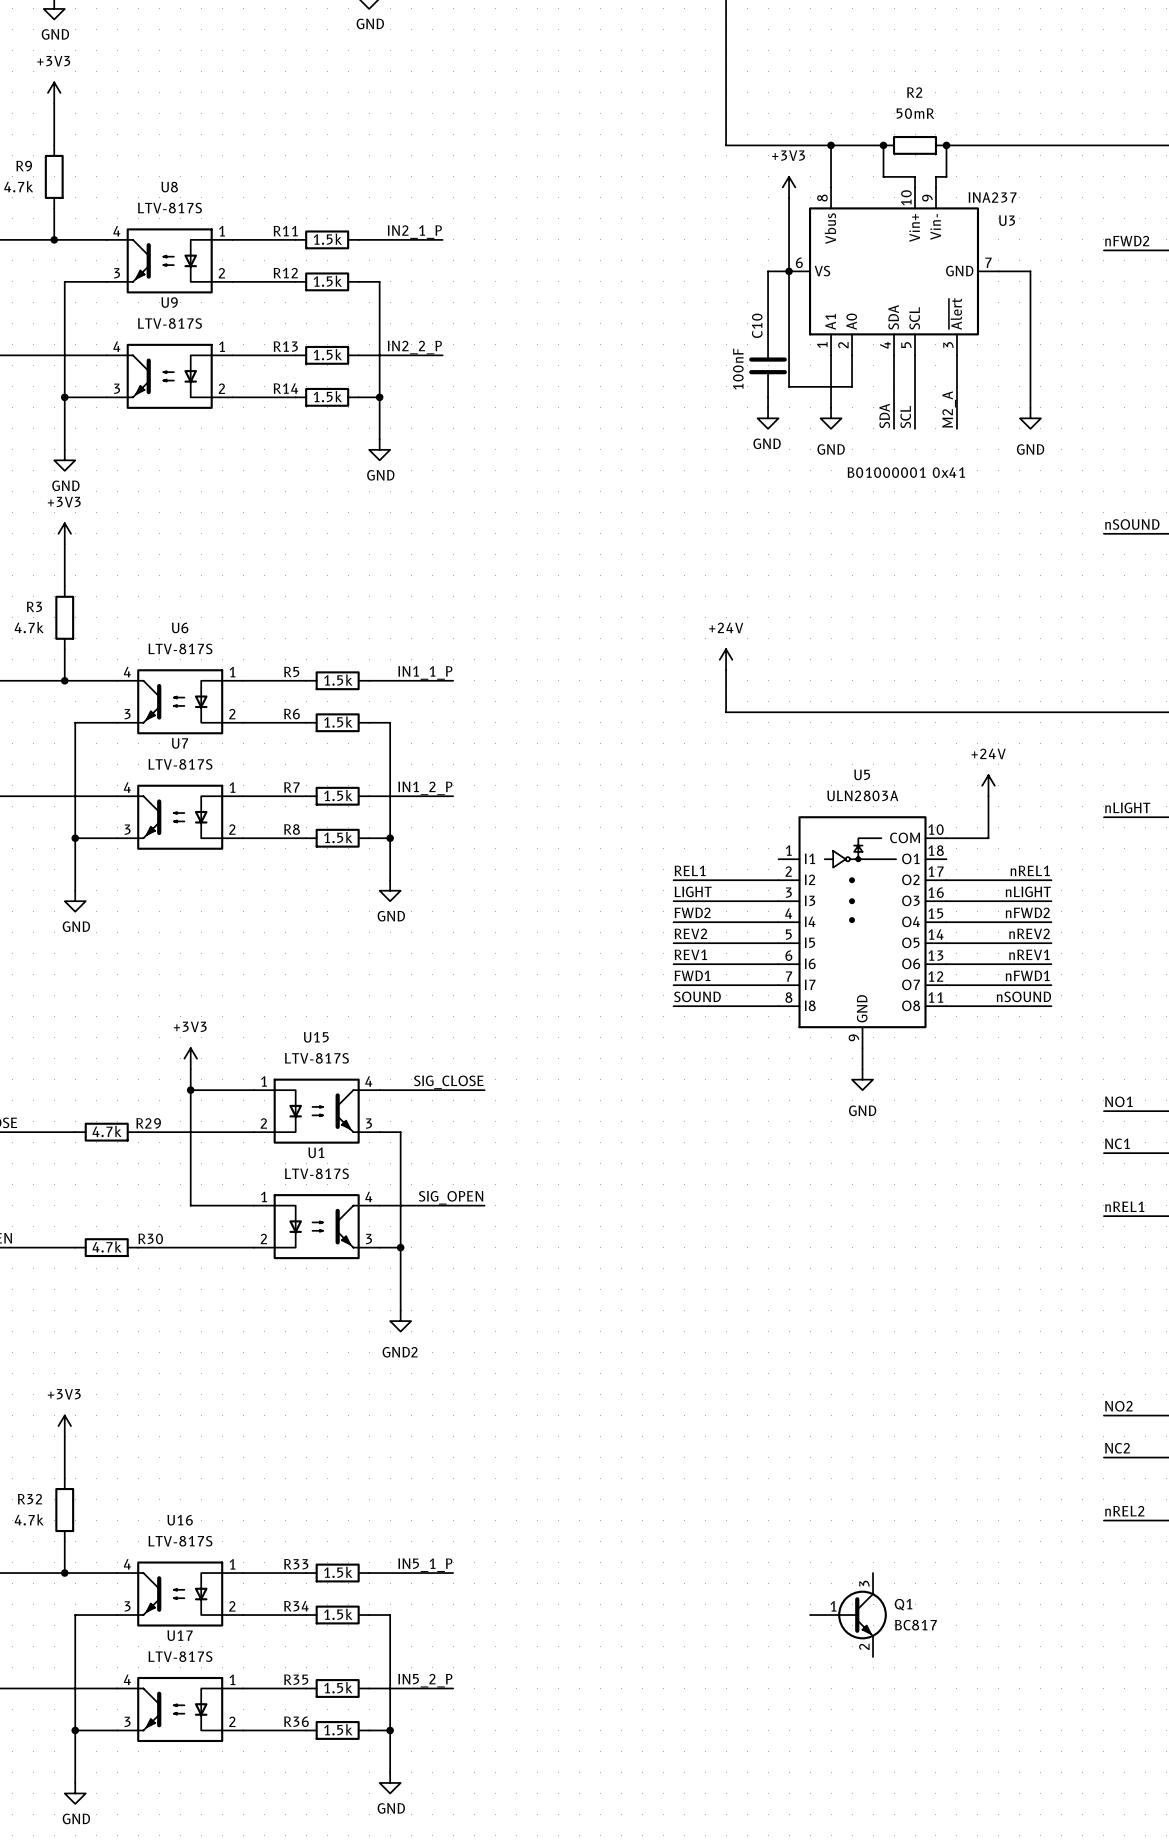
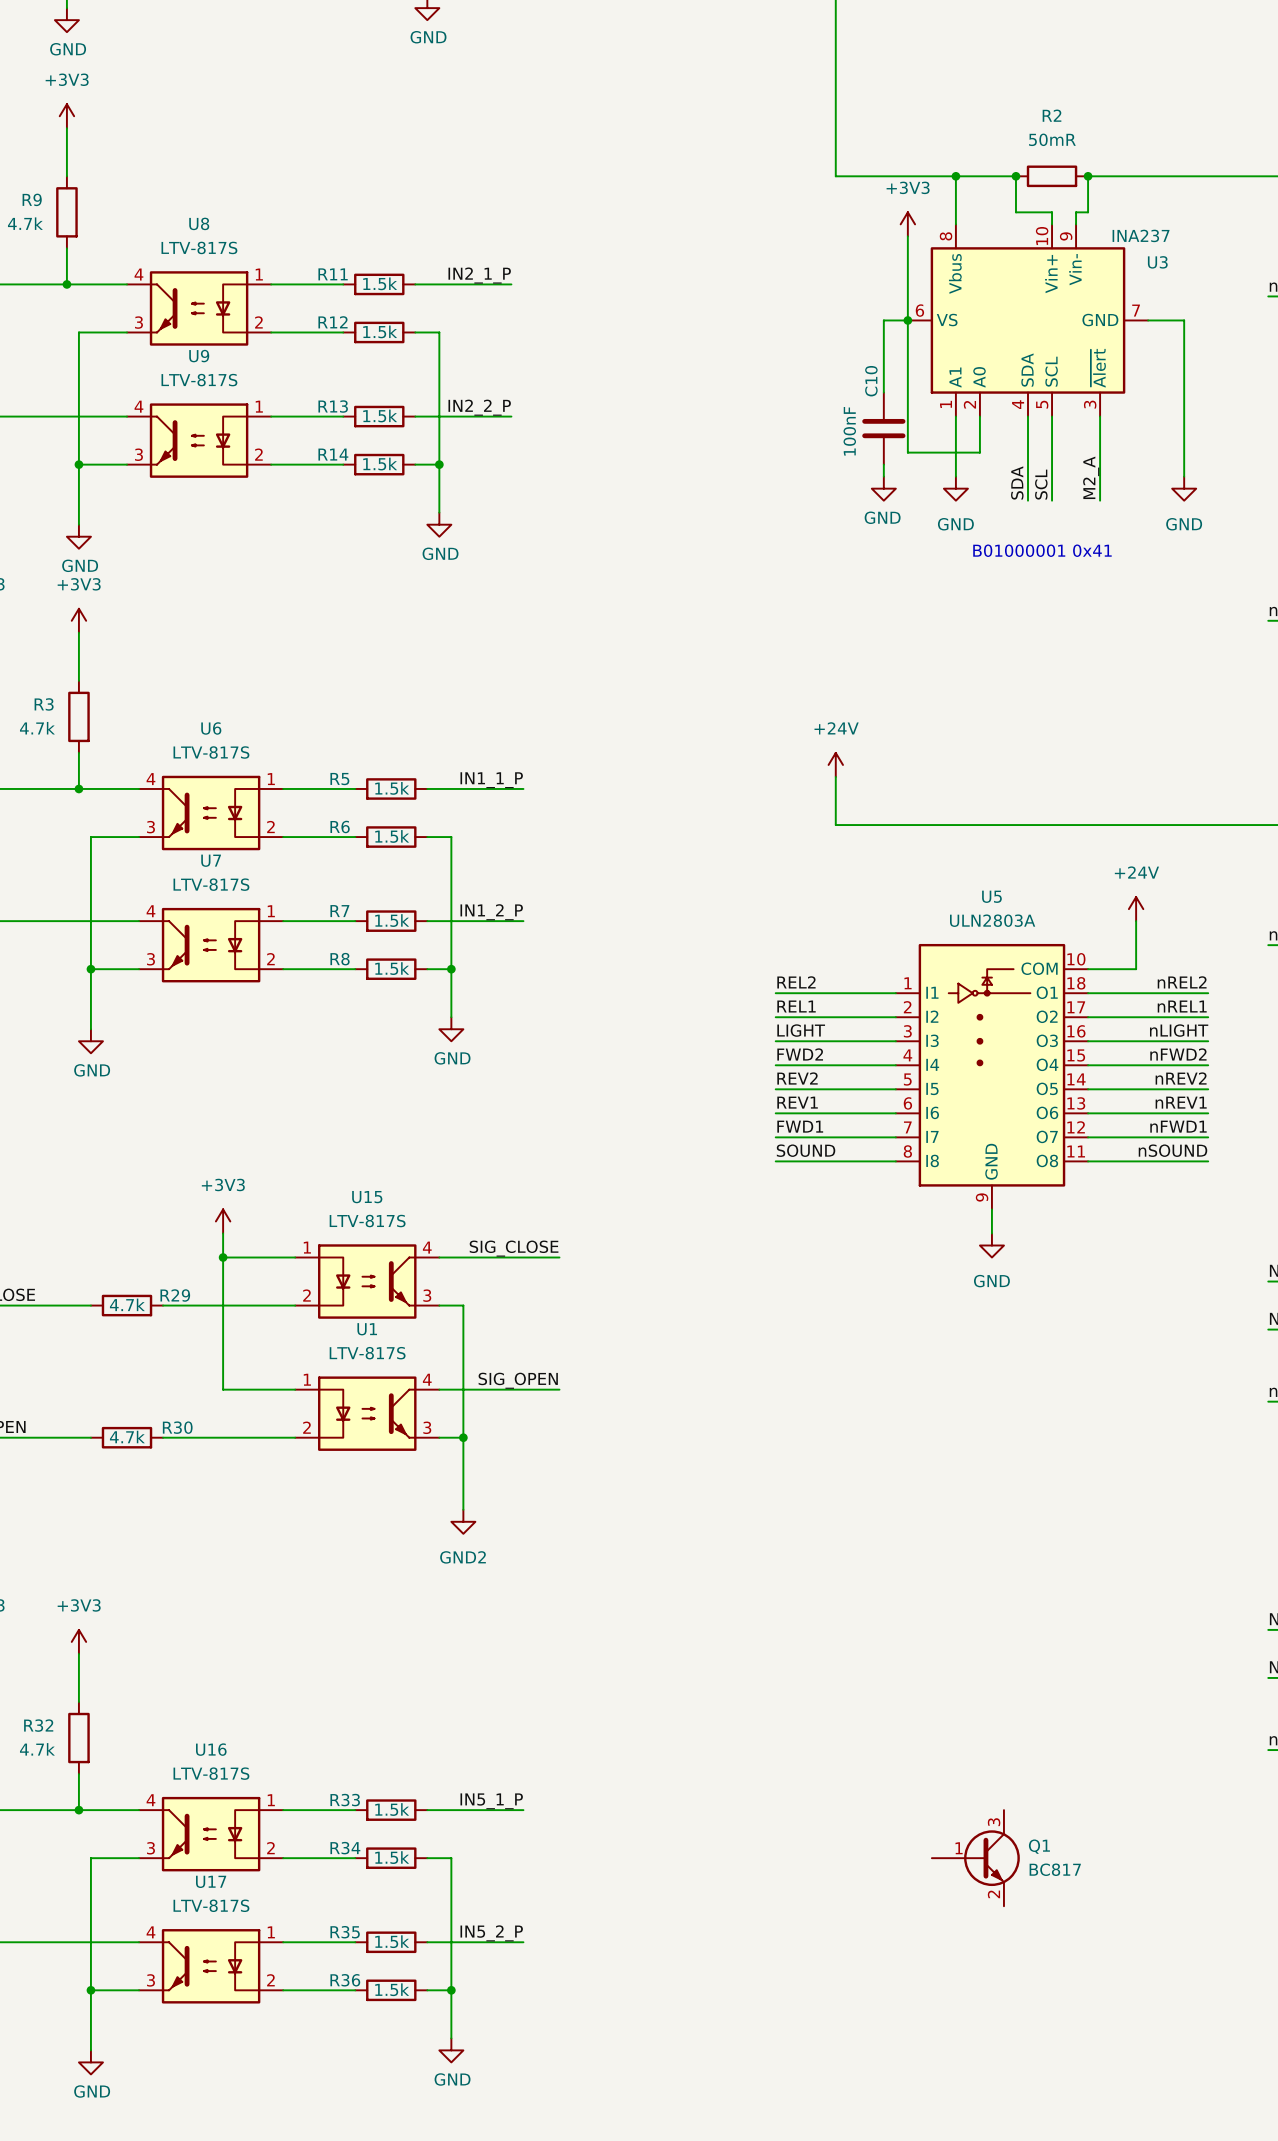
label: none -> REL2 (796, 982)
label: none -> nREL2 (1182, 982)
wire: none -> (775, 993) (895, 993)
wire: none -> (1088, 993) (1208, 993)

